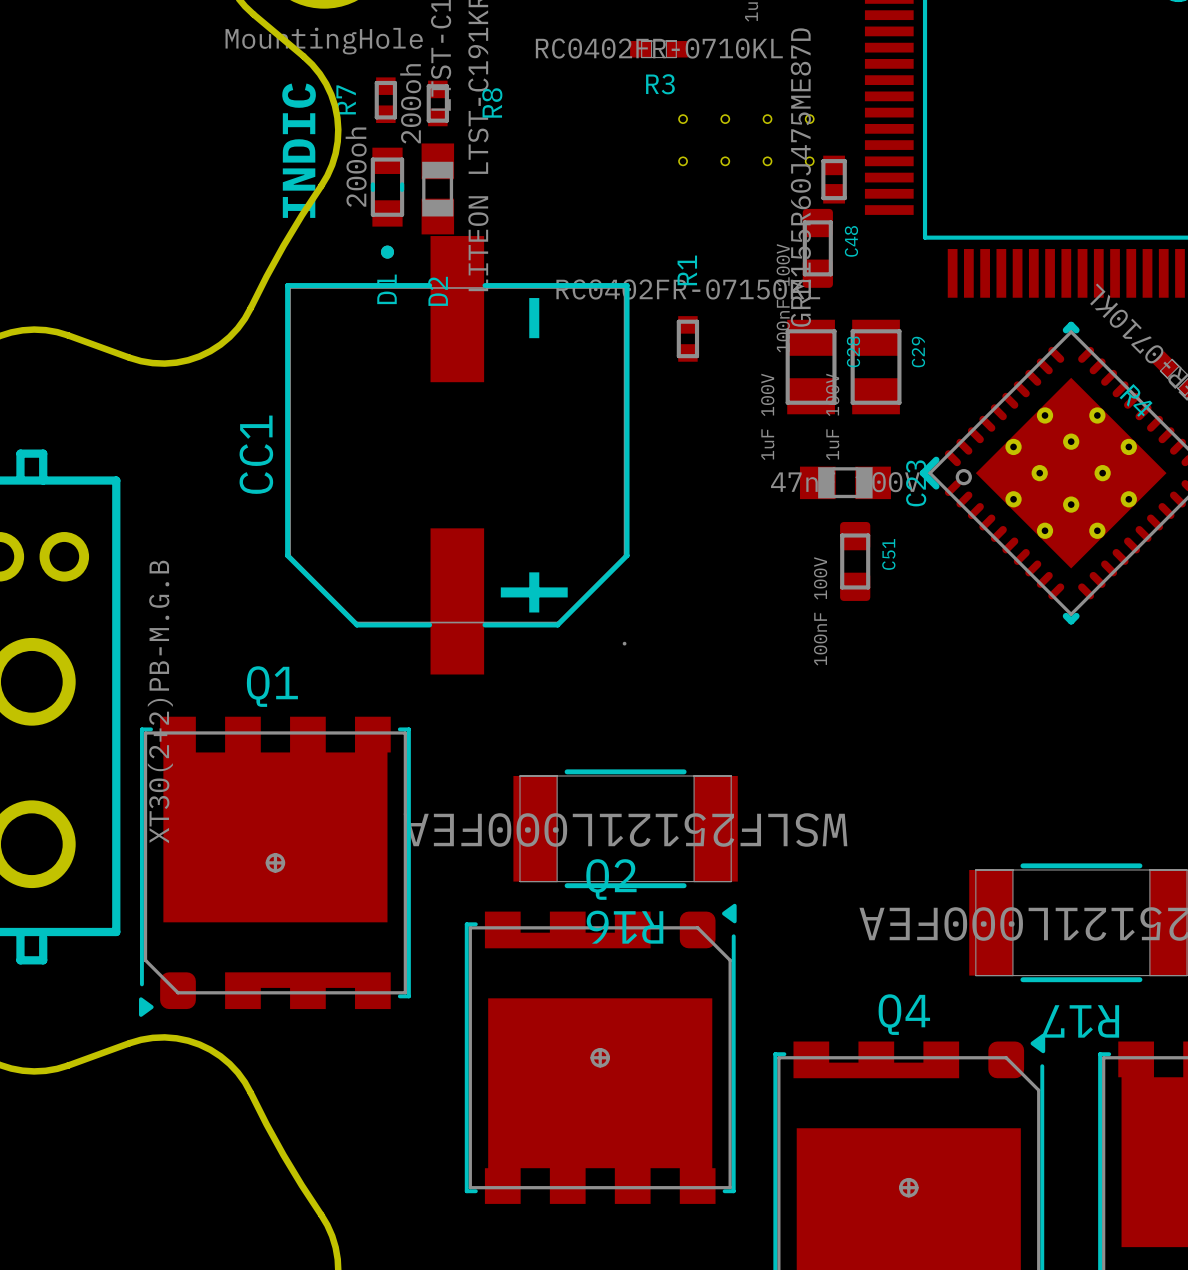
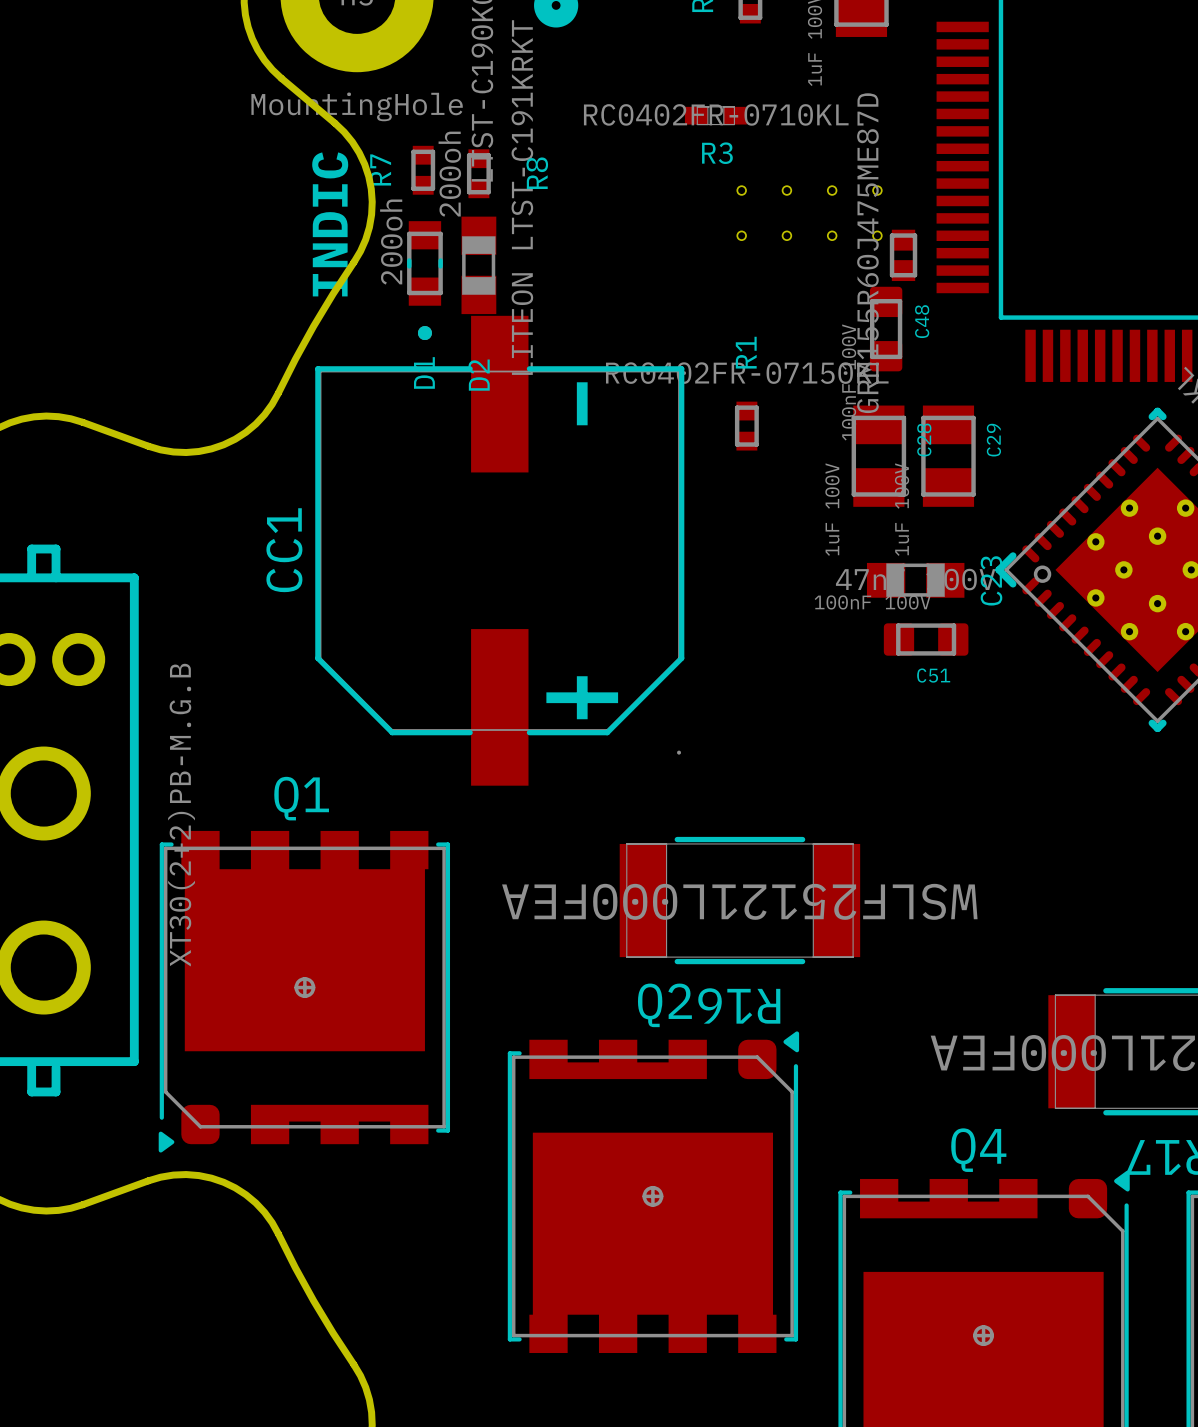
C51 rotation: 0° (855, 561) -> 90° clockwise (926, 639)
R16 position: (625, 828) -> (739, 900)

